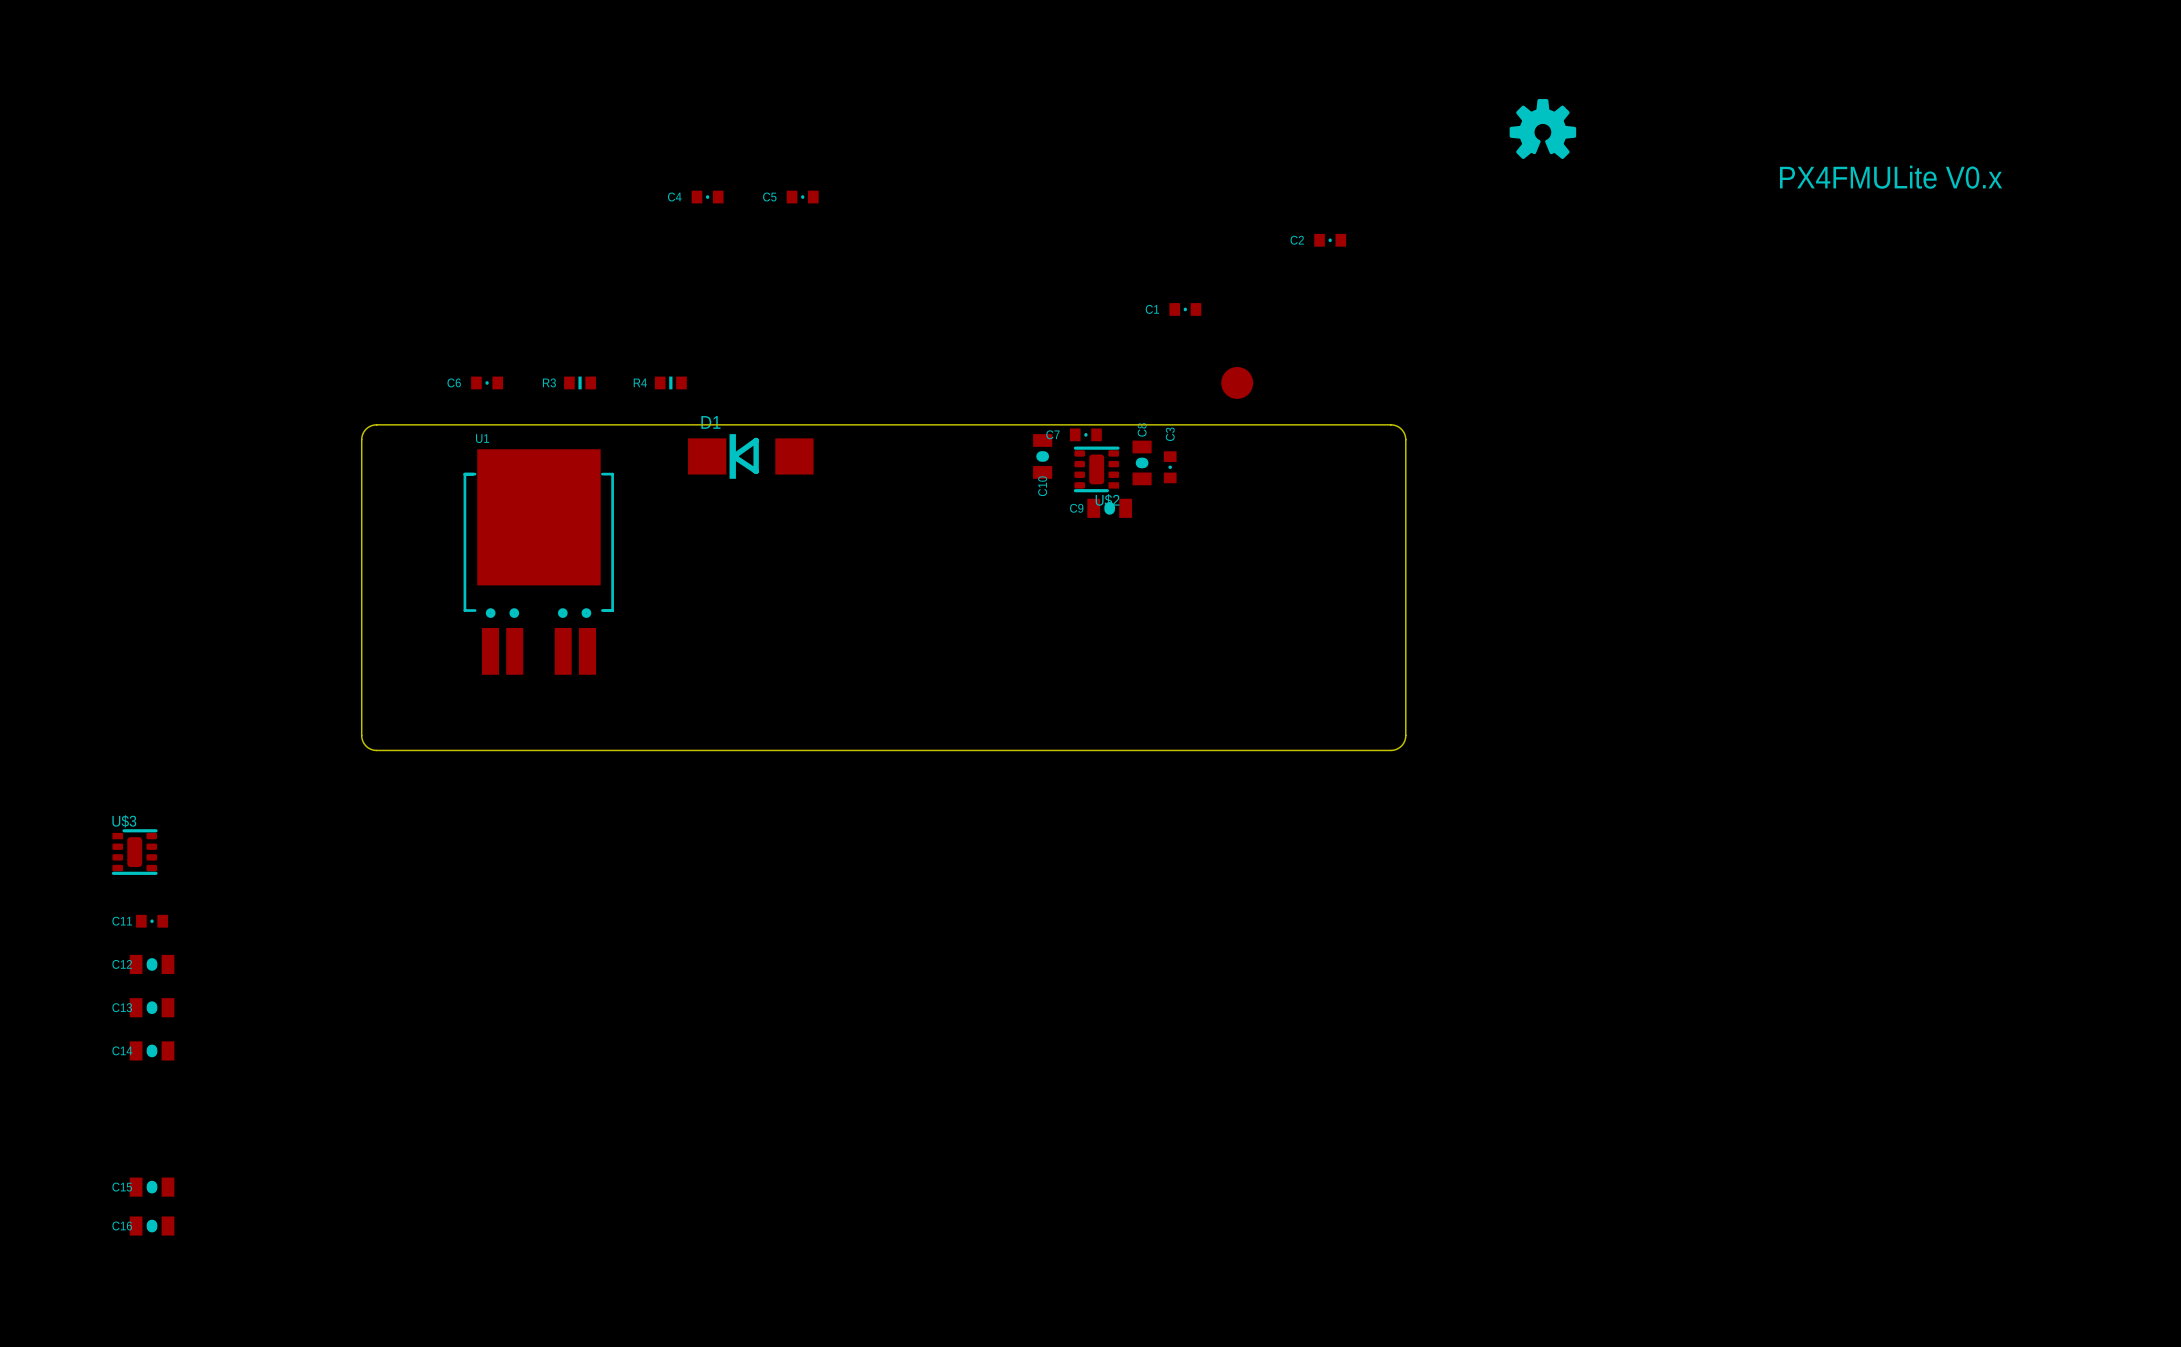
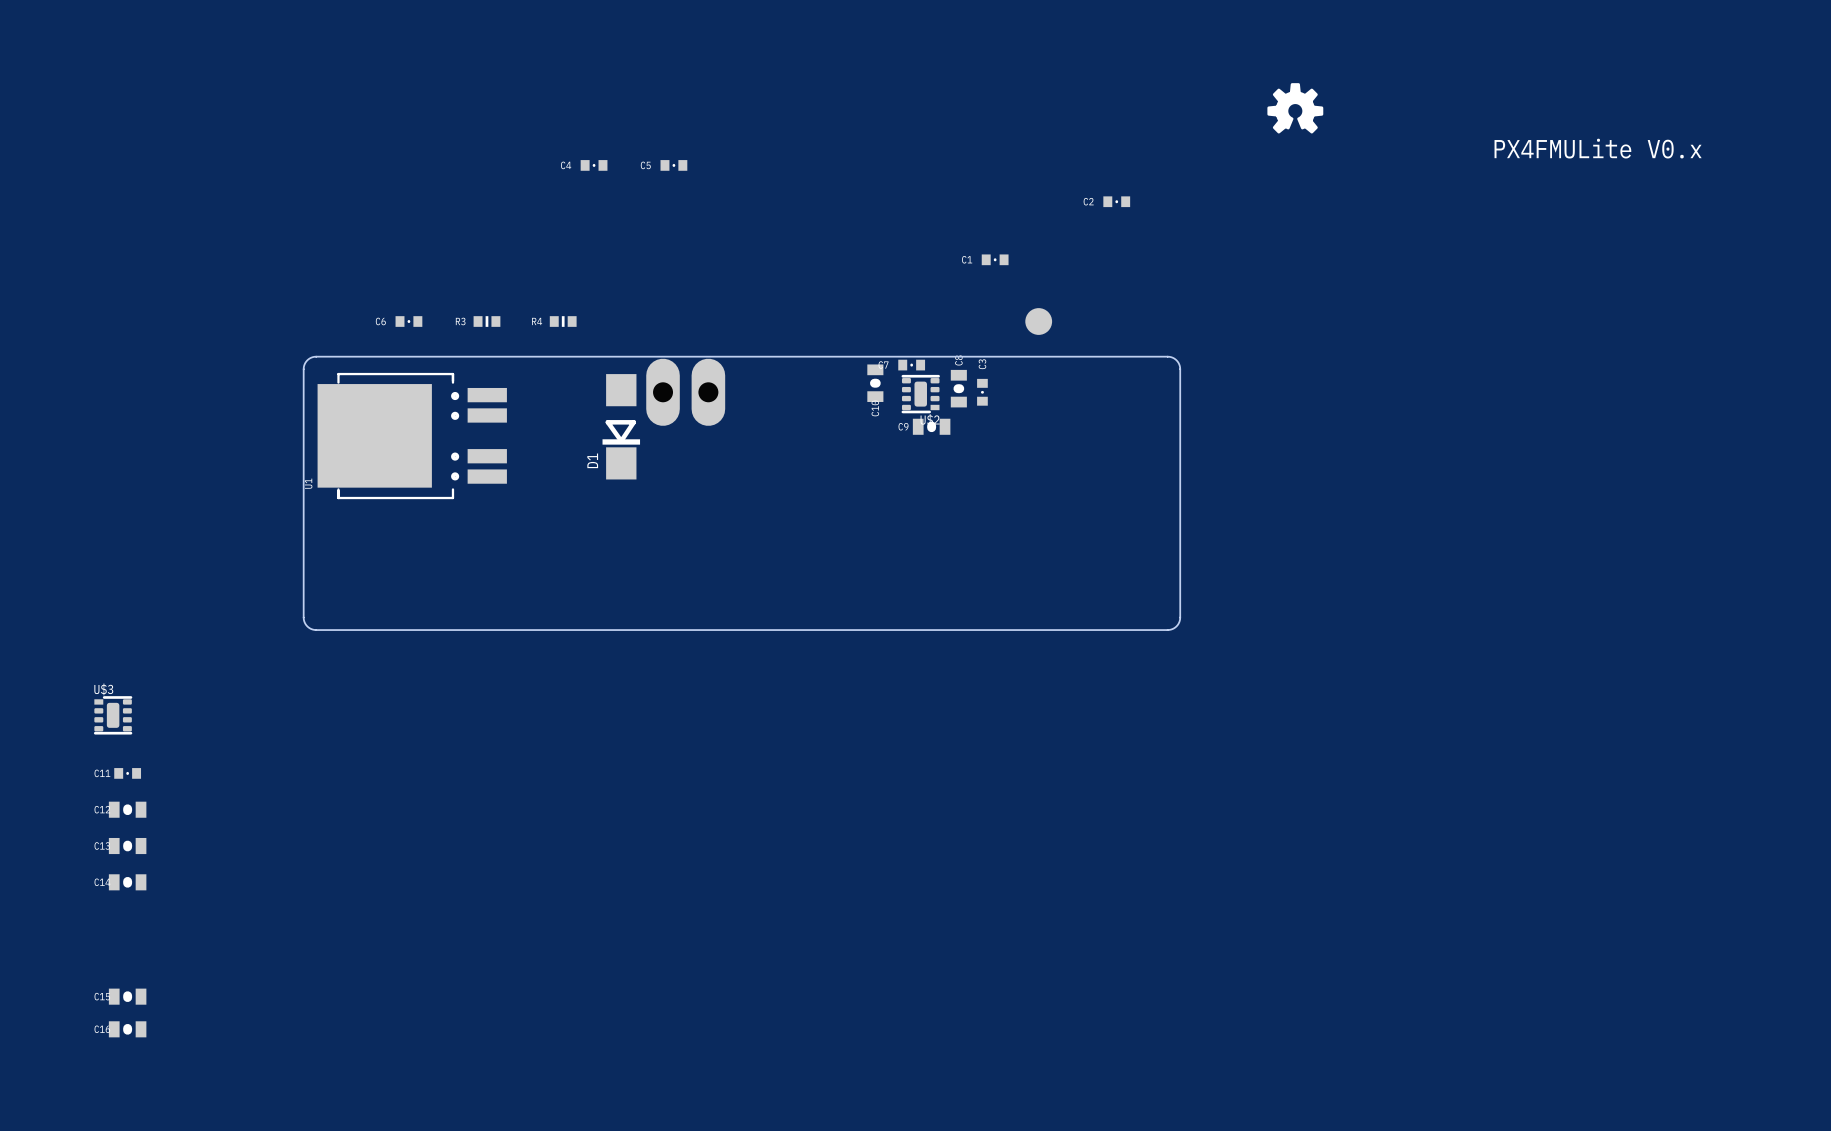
D1 rotation: 0° (750, 456) -> 90° counterclockwise (621, 426)
part: none -> (685, 392)
U1 rotation: 0° (538, 562) -> 90° counterclockwise (412, 436)

